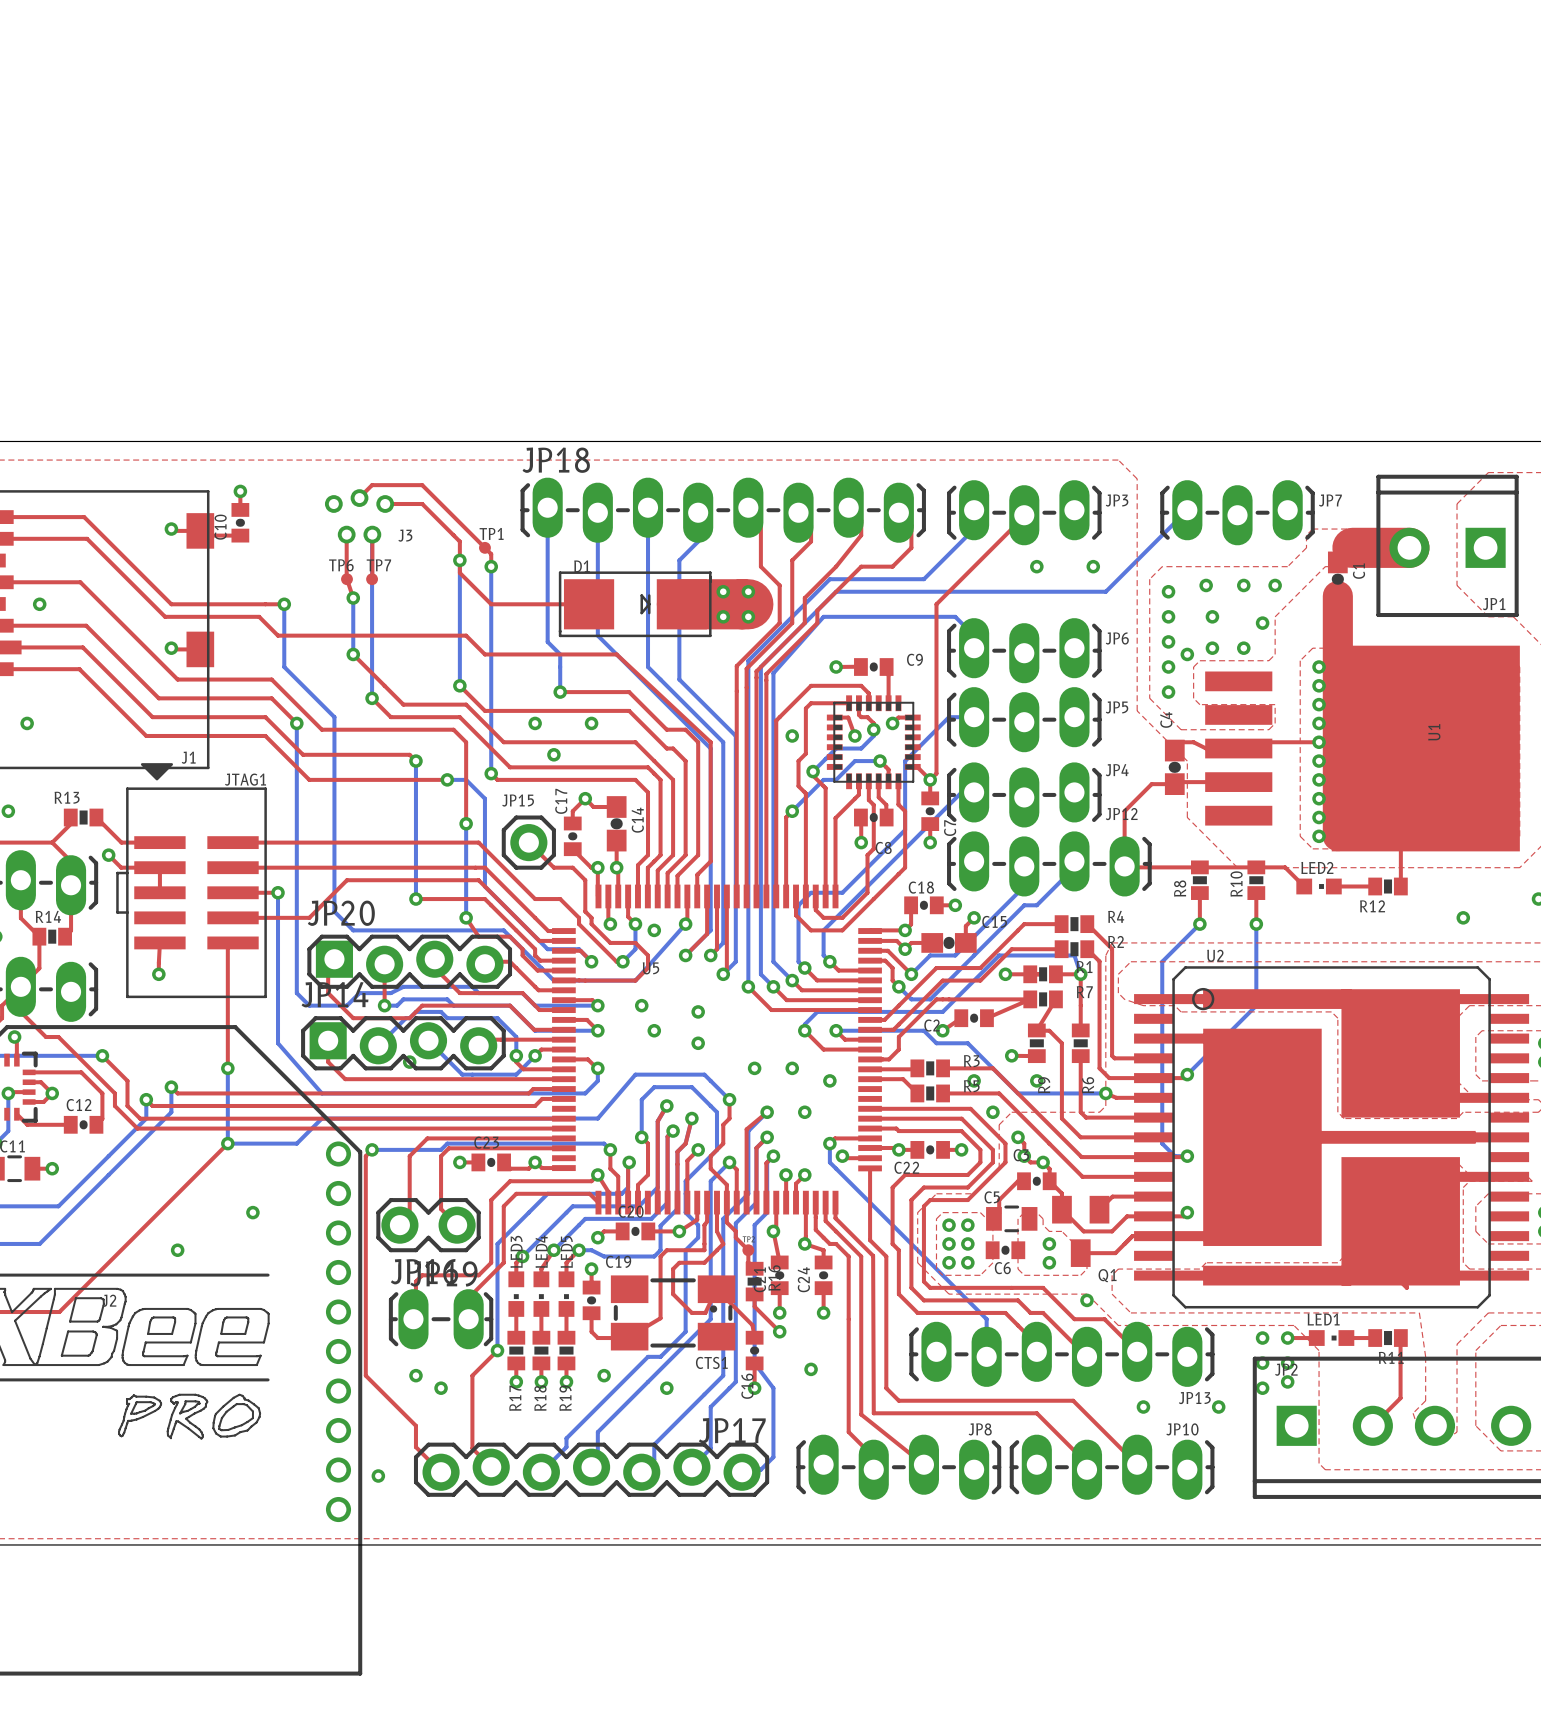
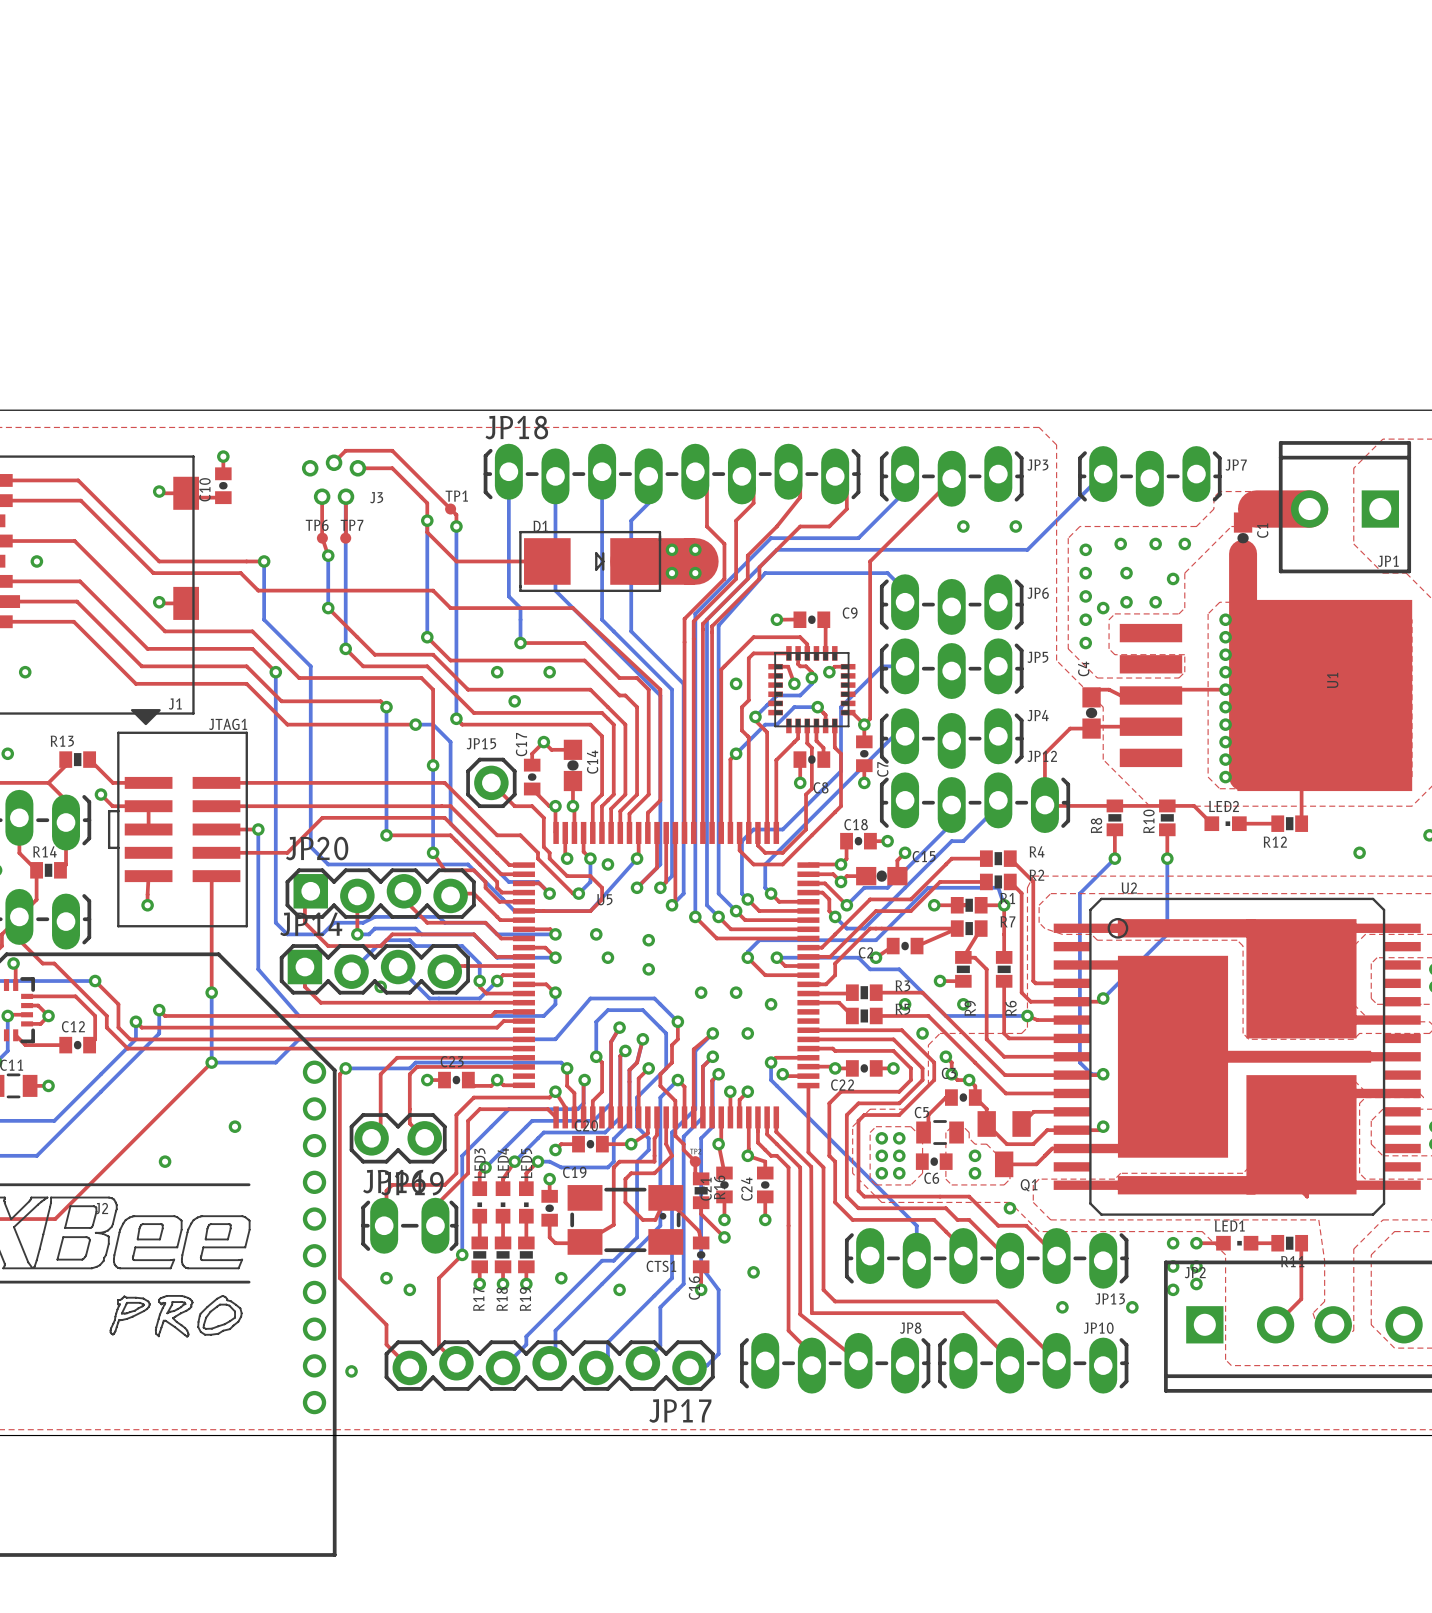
JP17 name position: JP17 (732, 1430) -> JP17 (680, 1410)

